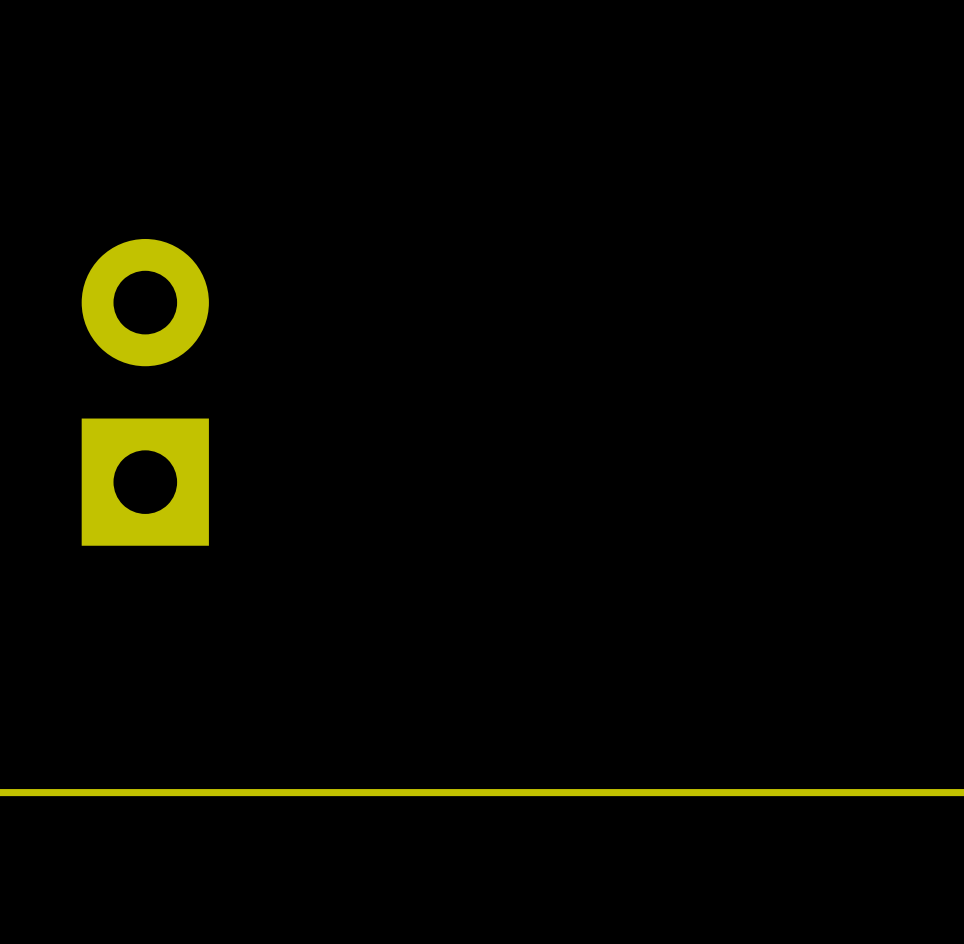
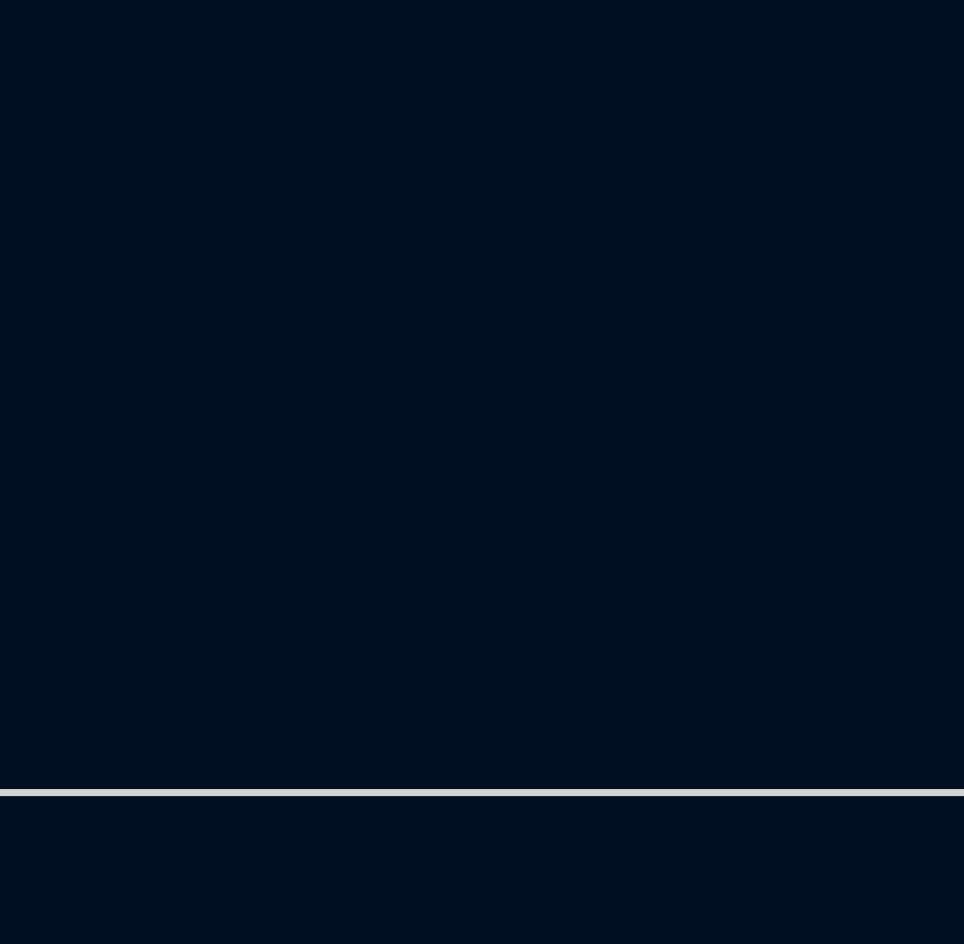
part: (145, 392) -> none

